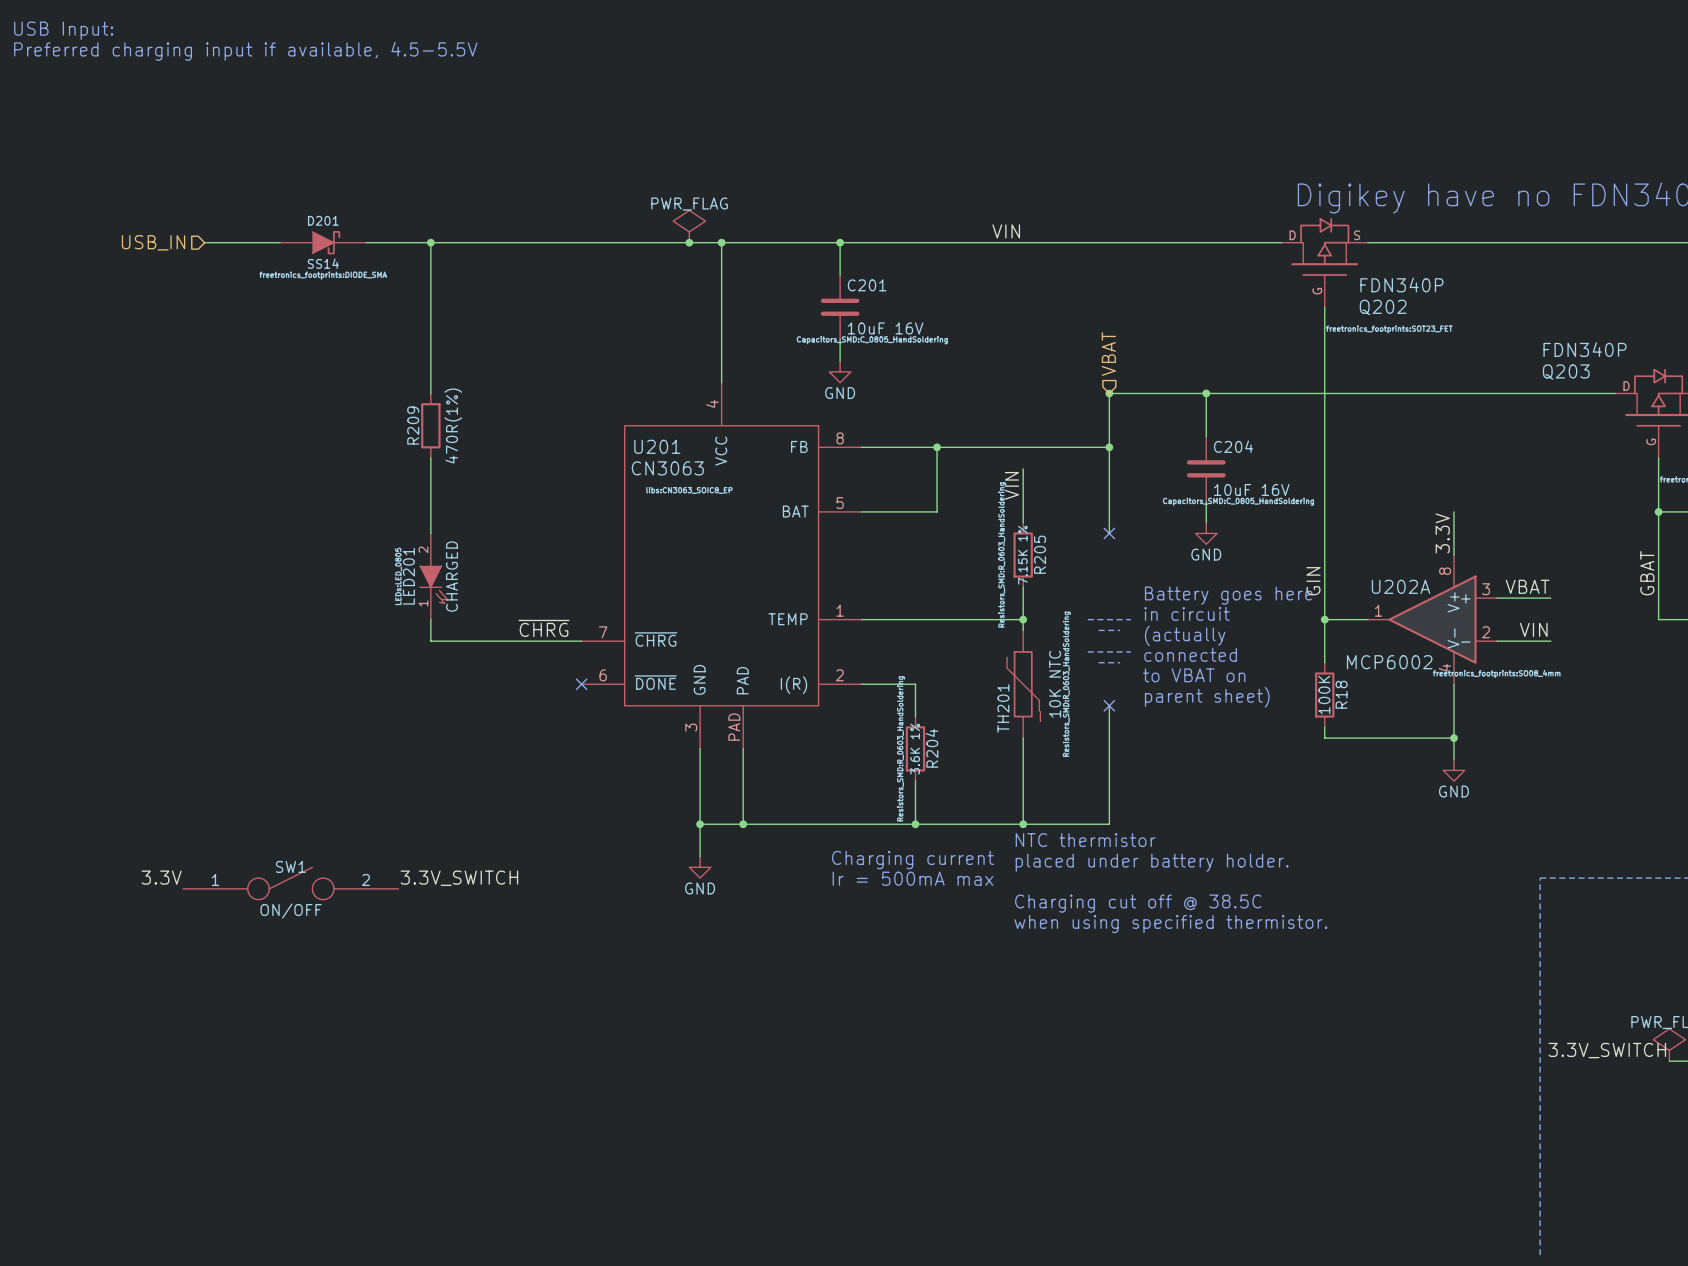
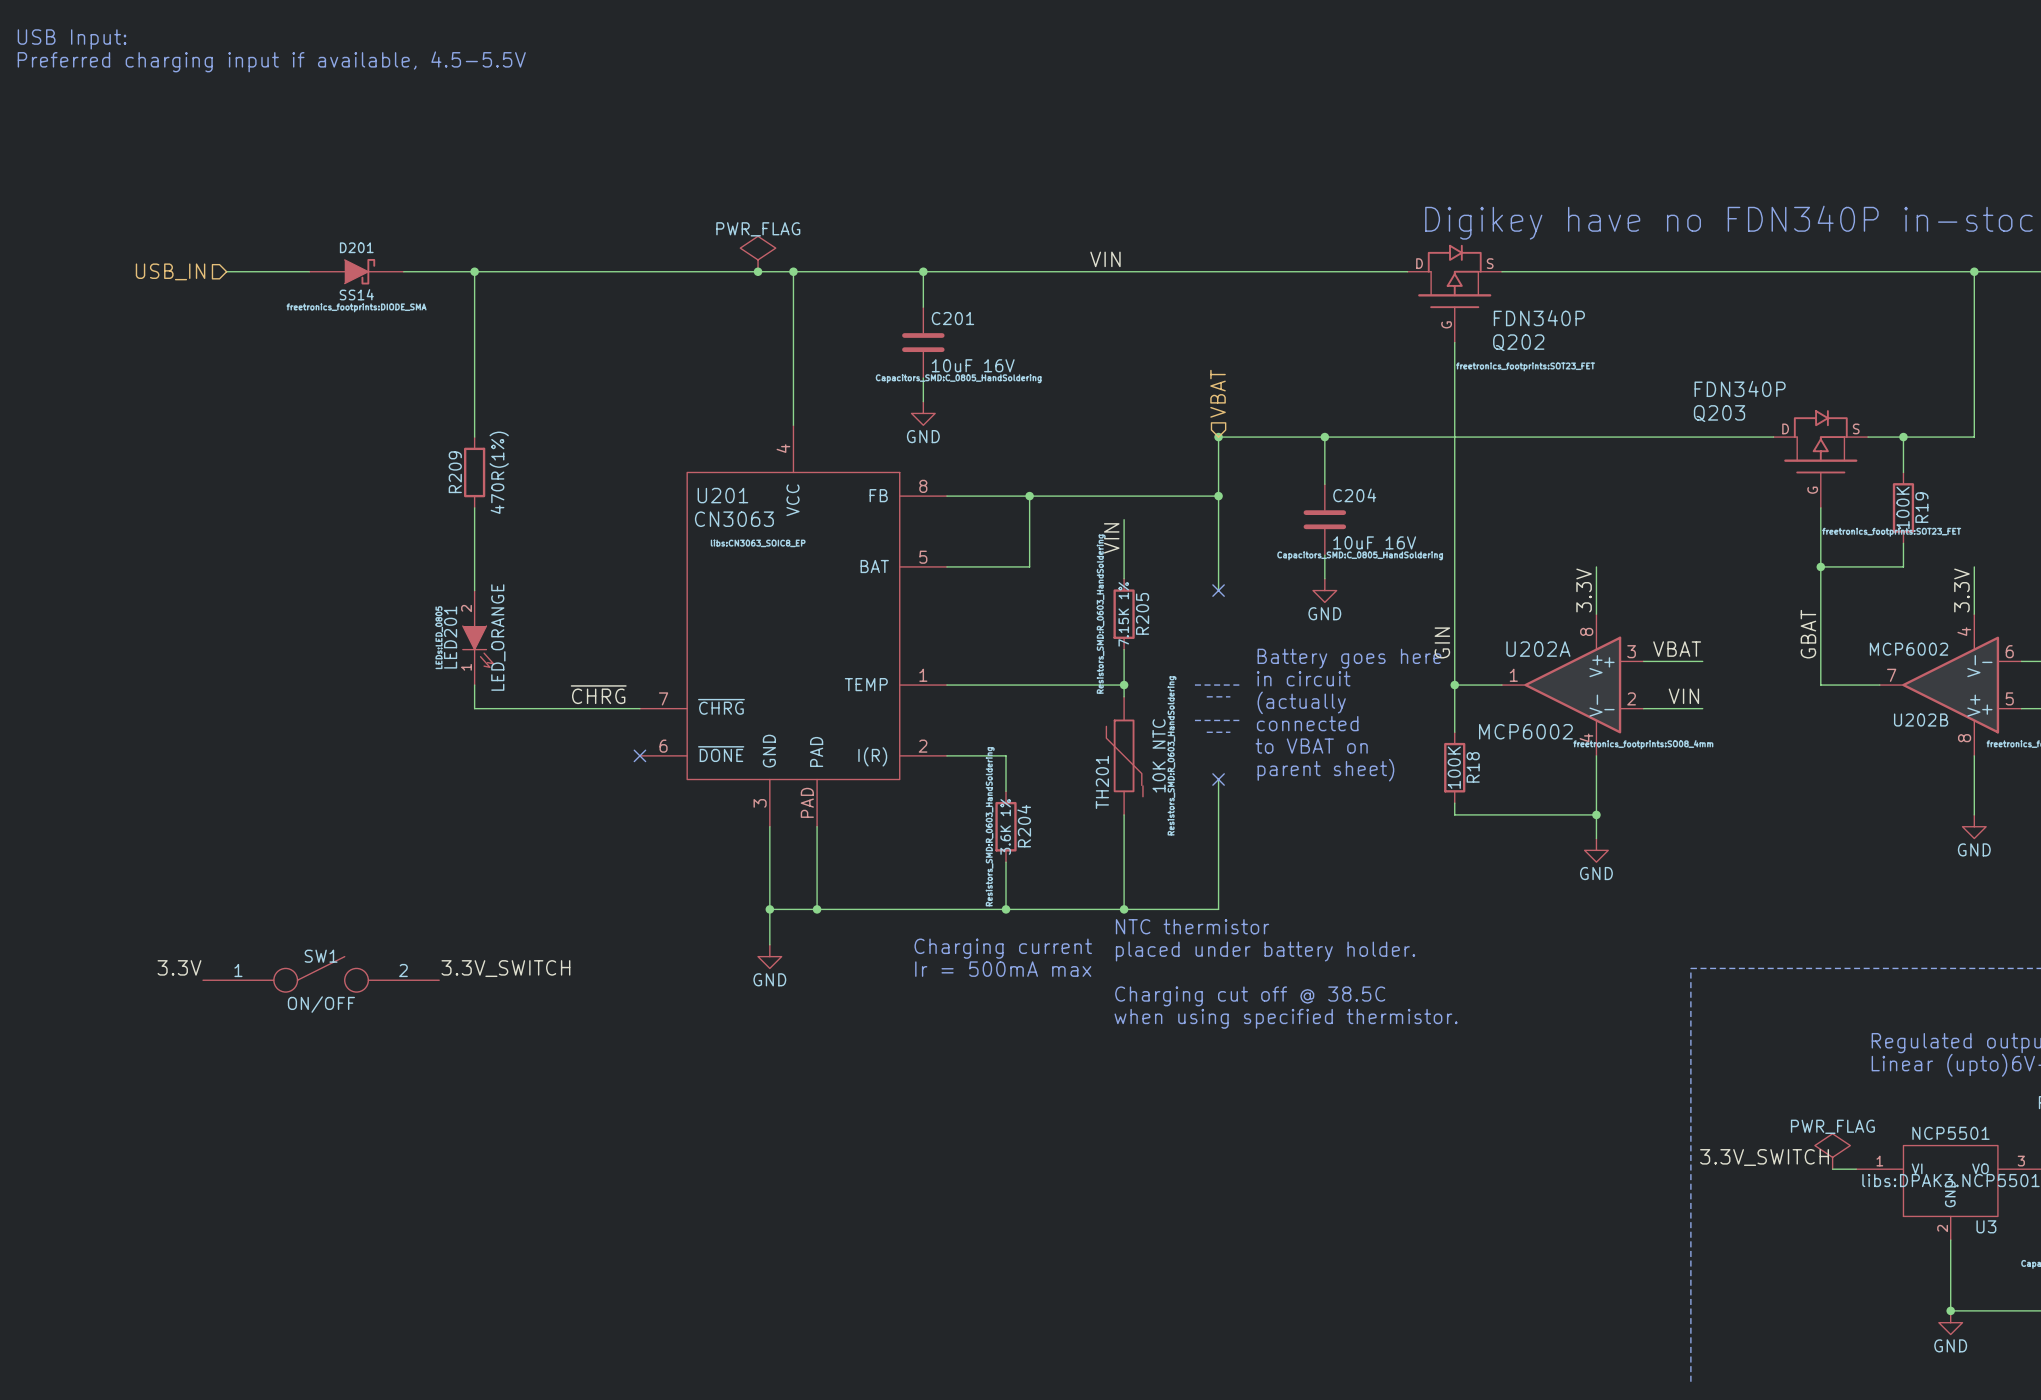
LED201 value: CHARGED (451, 576) -> LED_ORANGE (498, 637)

